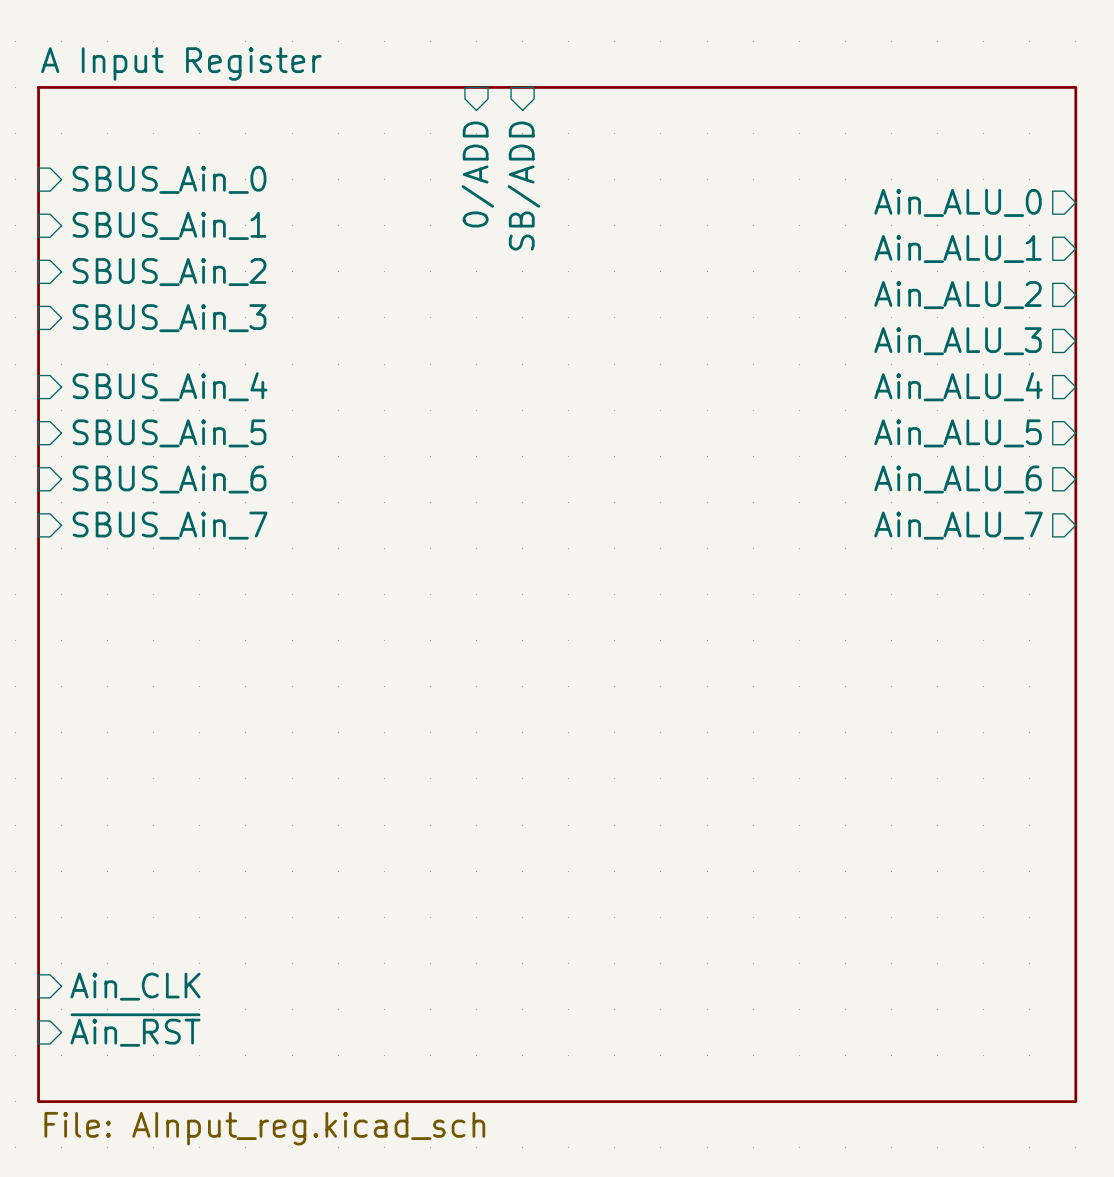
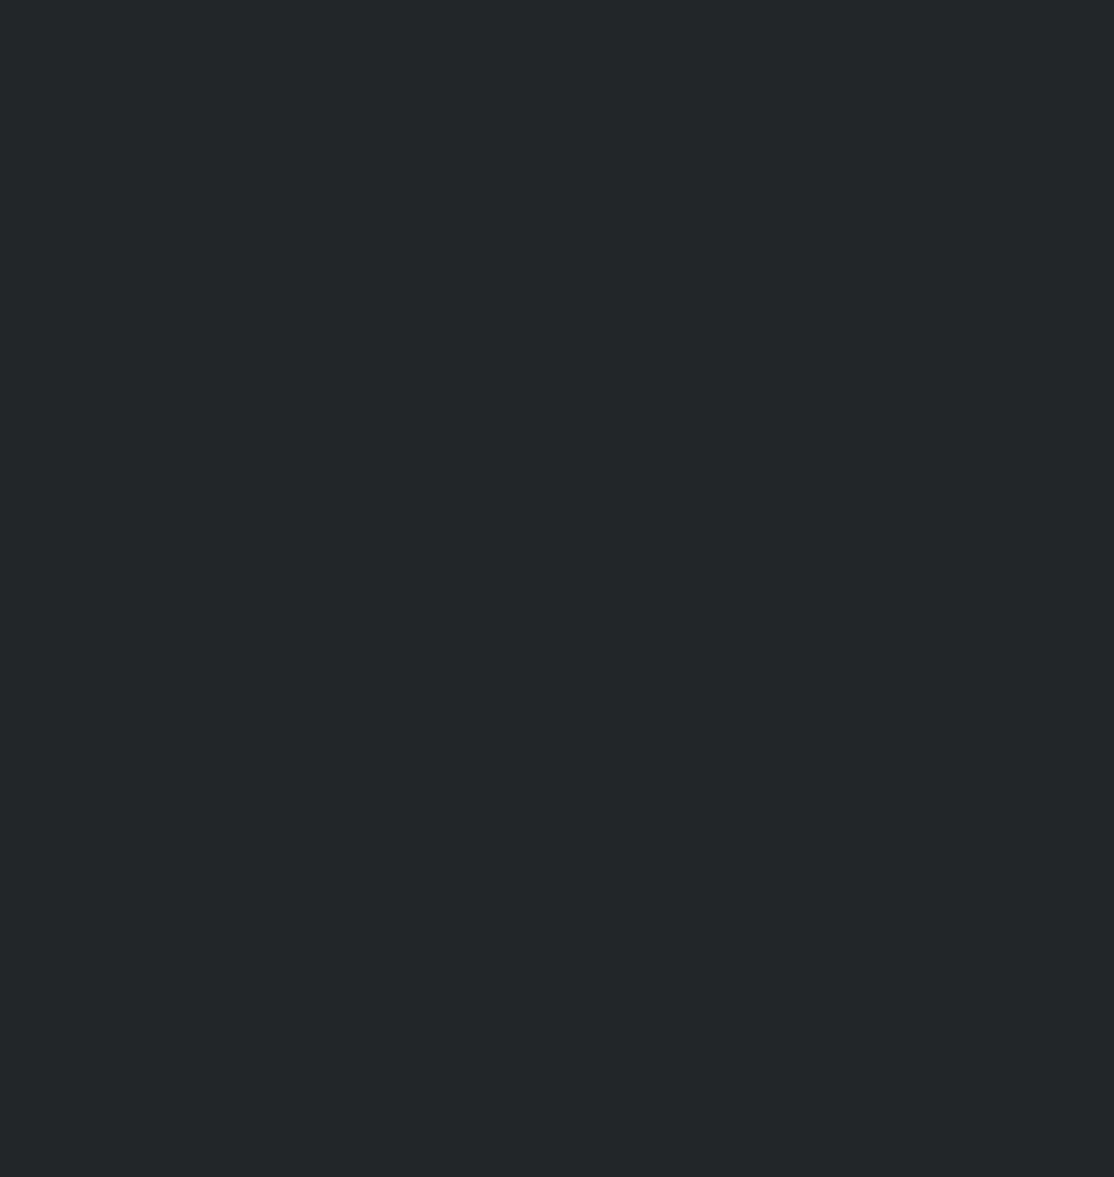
sheet pin: 0/ADD (477, 174) -> none
sheet pin: SBUS_Ain_0 (169, 179) -> none
sheet pin: SB/ADD (523, 186) -> none
sheet pin: Ain_ALU_0 (957, 202) -> none
sheet pin: SBUS_Ain_1 (169, 225) -> none
sheet pin: Ain_ALU_1 (957, 249) -> none
sheet pin: SBUS_Ain_2 (169, 272) -> none
sheet pin: Ain_ALU_2 (957, 295) -> none
sheet pin: SBUS_Ain_3 (169, 318) -> none
sheet pin: Ain_ALU_3 (957, 341) -> none
sheet pin: SBUS_Ain_4 (170, 386) -> none
sheet pin: Ain_ALU_4 (958, 386) -> none
sheet pin: SBUS_Ain_5 (169, 433) -> none
sheet pin: Ain_ALU_5 (957, 433) -> none
sheet pin: SBUS_Ain_6 (169, 479) -> none
sheet pin: Ain_ALU_6 (957, 479) -> none
sheet pin: SBUS_Ain_7 (170, 525) -> none
sheet pin: Ain_ALU_7 (958, 525) -> none
sheet A Input Register: File: AInput_reg.kicad_sch (557, 594) -> none
sheet pin: Ain_CLK (135, 986) -> none
sheet pin: ~{Ain_RST} (135, 1030) -> none

